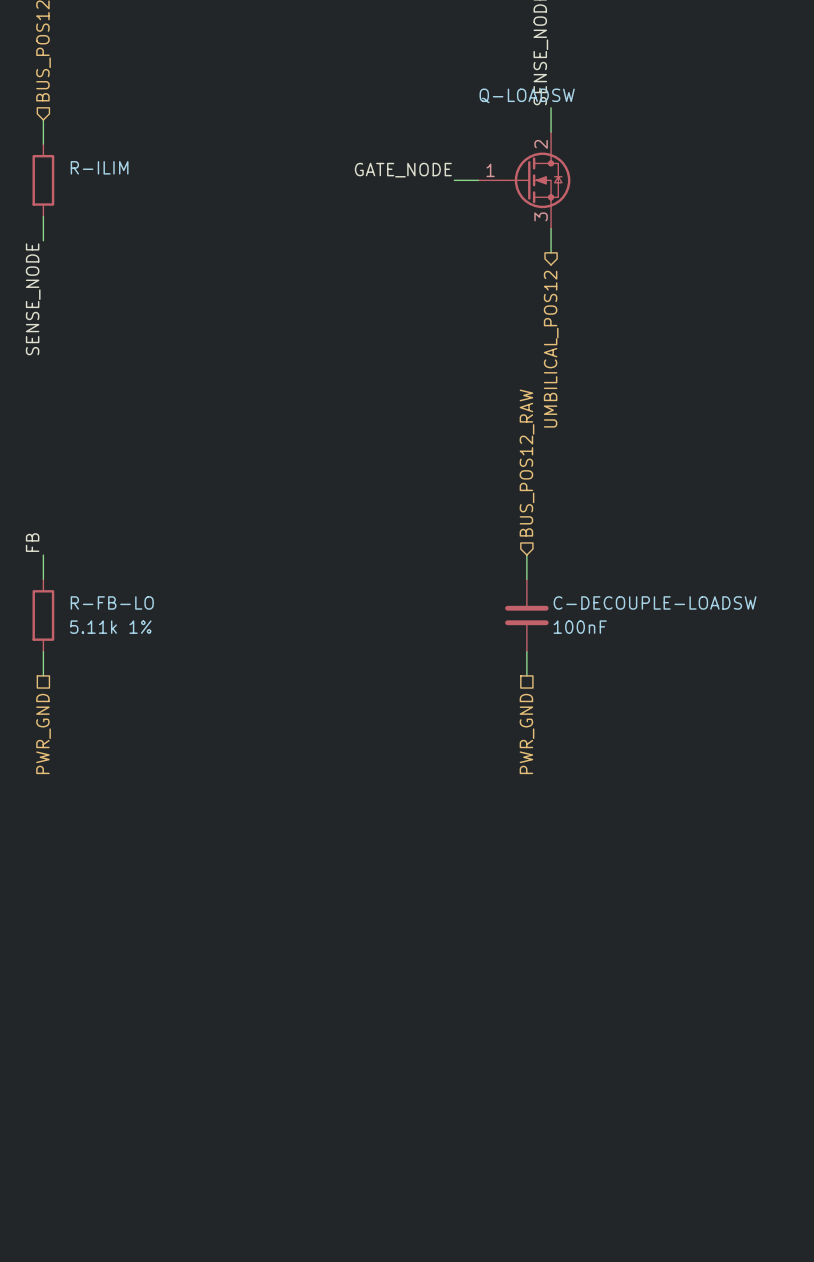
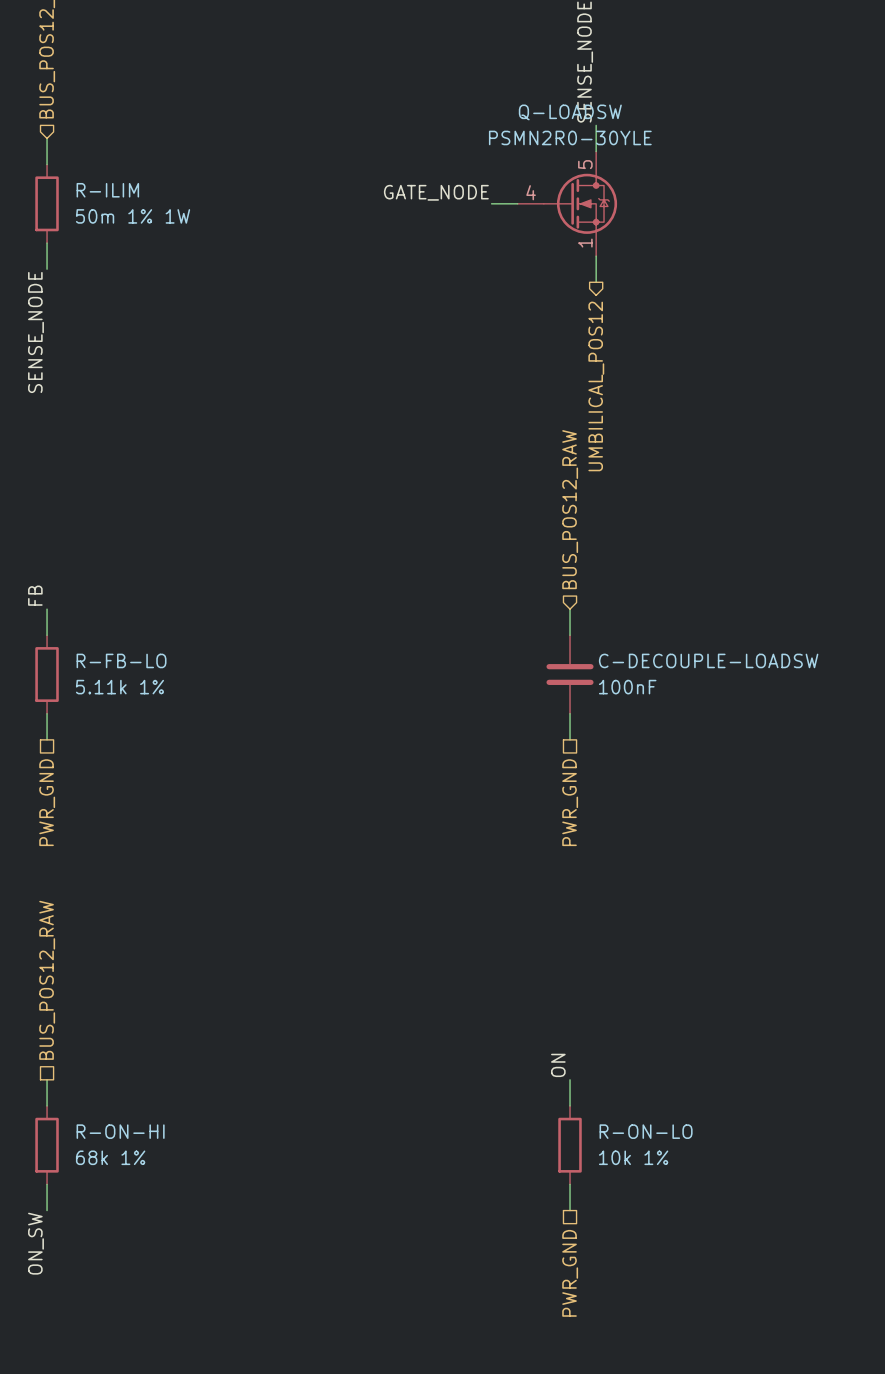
Q-LOADSW value: none -> PSMN2R0-30YLE (570, 137)
Q-LOADSW symbol: [478, 132, 571, 229] -> [517, 151, 618, 257]
R-ILIM value: none -> 50m 1% 1W (133, 216)
hierarchical label: none -> BUS_POS12_RAW (47, 980)
label: none -> ON (558, 1065)
wire: none -> (47, 1079) (47, 1105)
wire: none -> (570, 1079) (570, 1105)
R-ON-HI: none -> 68k 1% (47, 1145)
R-ON-LO: none -> 10k 1% (570, 1145)
wire: none -> (47, 1184) (47, 1210)
wire: none -> (570, 1184) (570, 1210)
label: none -> ON_SW (35, 1243)
hierarchical label: none -> PWR_GND (570, 1273)

